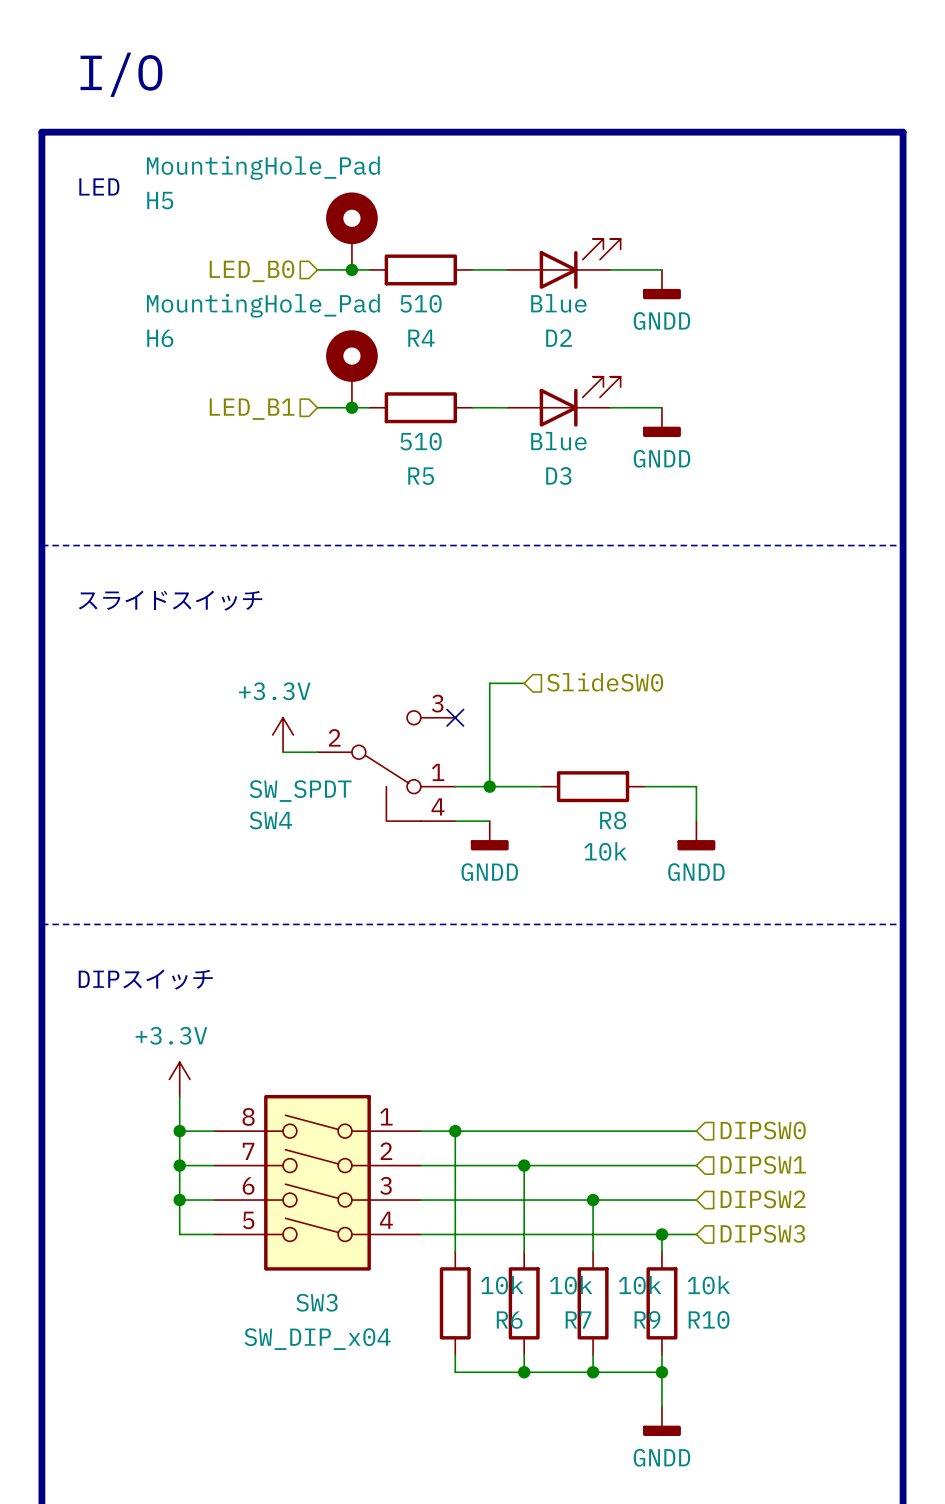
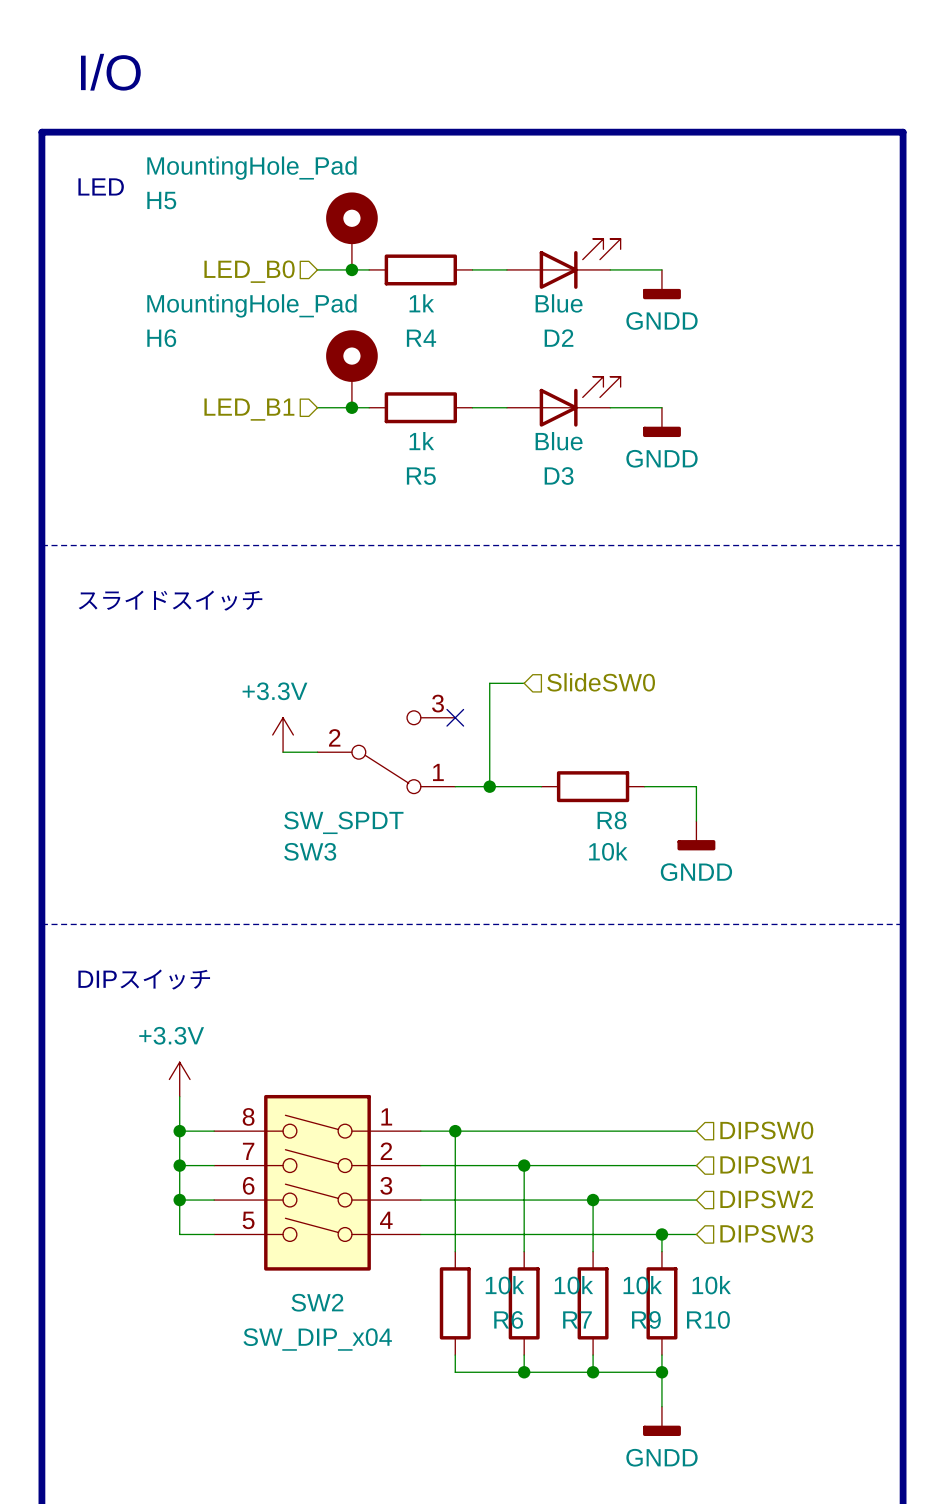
R4 value: 510 (421, 303) -> 1k (421, 303)
R5 value: 510 (421, 441) -> 1k (421, 441)
SW3: none -> SW_SPDT (386, 752)
SW4: SW_SPDT (386, 766) -> none
wire: (455, 821) (489, 821) -> none
power symbol: GNDD (489, 835) -> none
SW3 name: SW3 (317, 1302) -> SW2 (317, 1302)

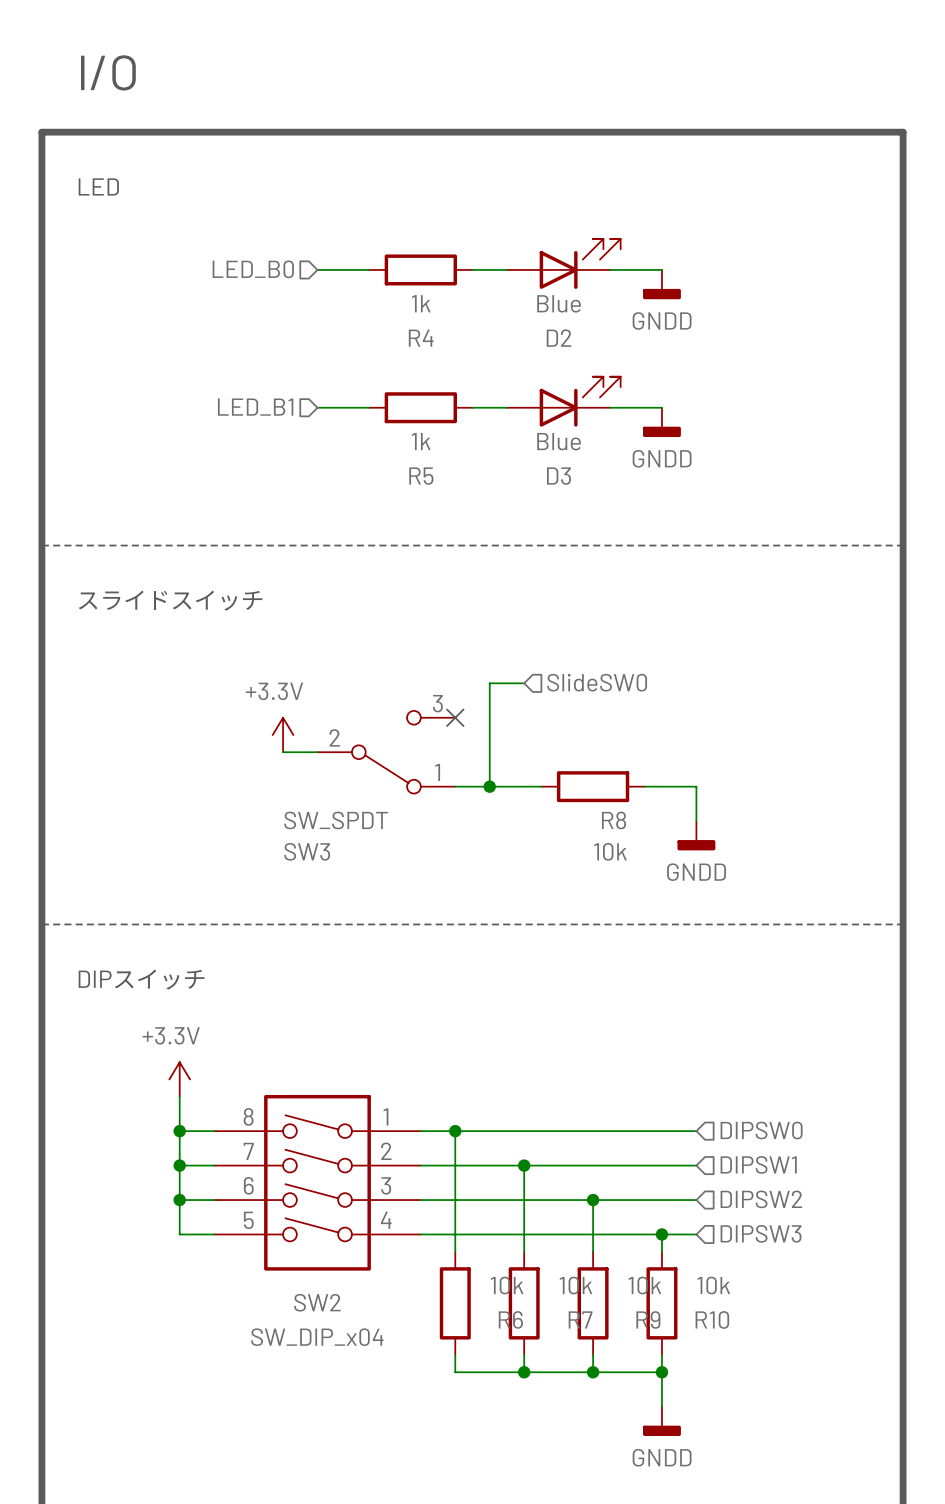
H5: MountingHole_Pad (351, 231) -> none
junction: (351, 269) -> none
H6: MountingHole_Pad (351, 368) -> none
junction: (351, 407) -> none

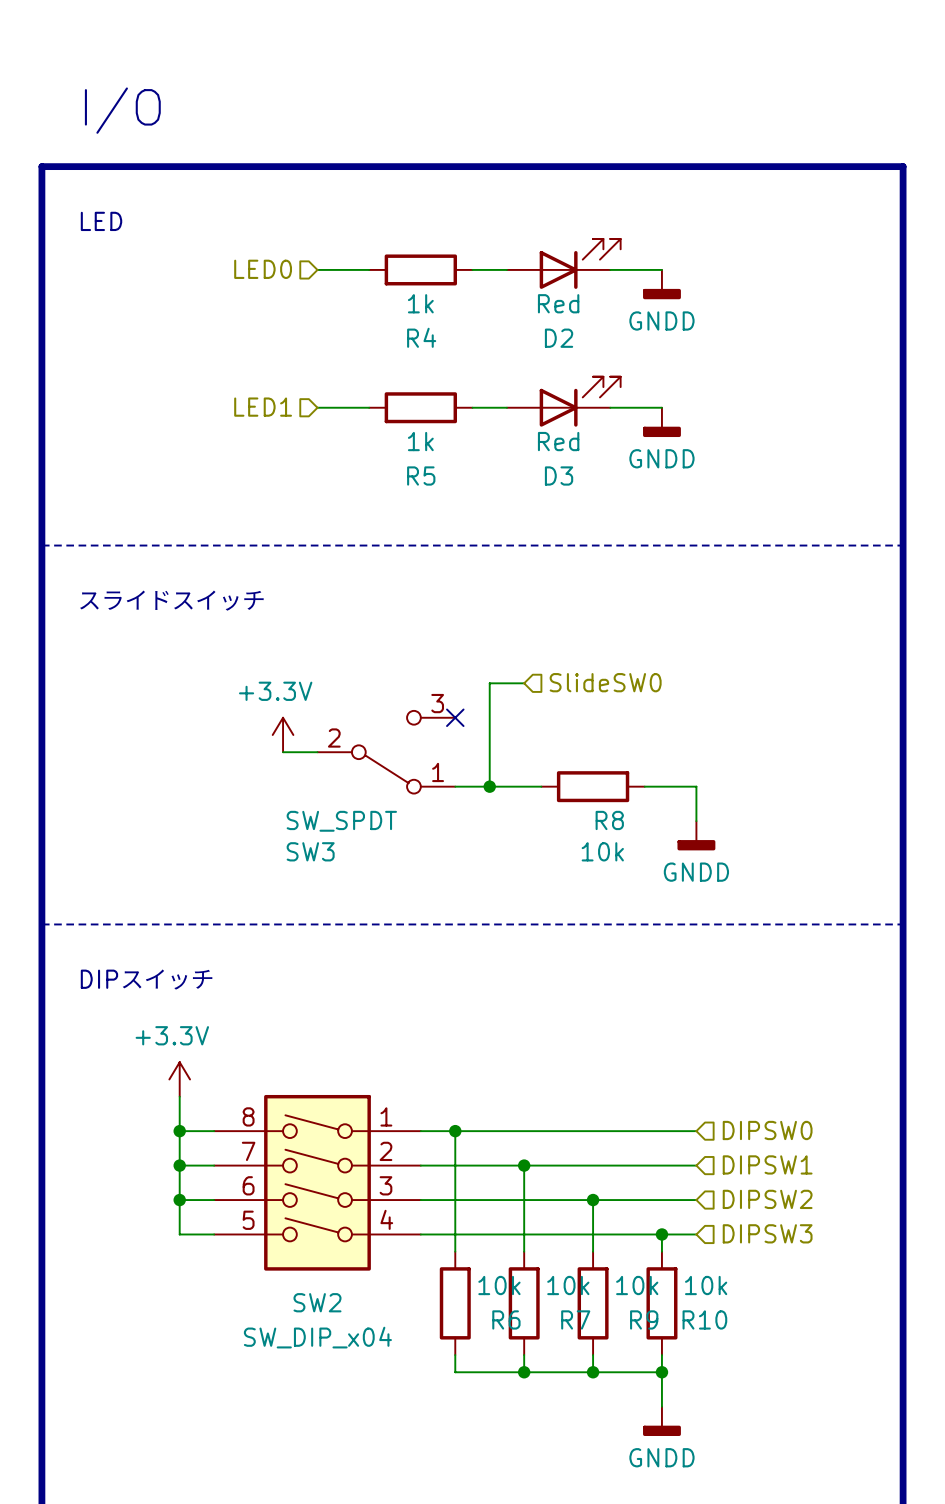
text position: I/O (108, 72) -> I/O (122, 110)
line: (41, 166) (41, 132) (903, 132) (903, 166) -> (41, 166) (903, 166)
text position: LED (98, 186) -> LED (101, 221)
hierarchical label: LED_B0 (253, 269) -> LED0 (263, 269)
D2 value: Blue (559, 303) -> Red (558, 303)
hierarchical label: LED_B1 (255, 407) -> LED1 (263, 407)
D3 value: Blue (559, 441) -> Red (558, 441)

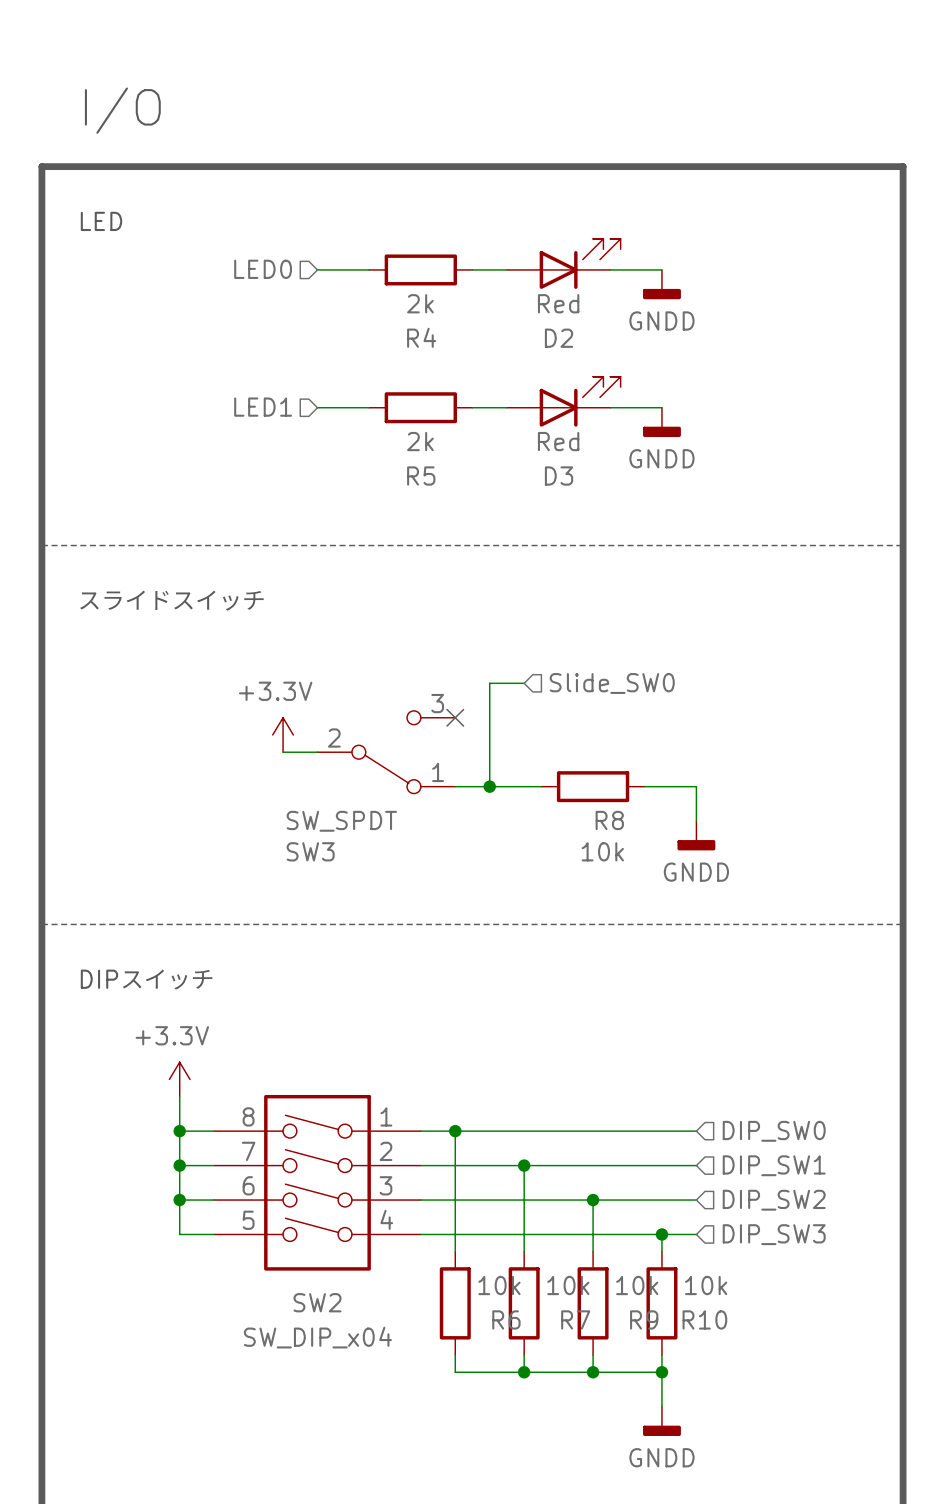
R4 value: 1k (420, 303) -> 2k (420, 303)
R5 value: 1k (420, 441) -> 2k (420, 441)
hierarchical label: SlideSW0 (605, 682) -> Slide_SW0 (612, 683)
hierarchical label: DIPSW0 (767, 1130) -> DIP_SW0 (774, 1131)
hierarchical label: DIPSW1 (767, 1164) -> DIP_SW1 (774, 1165)
hierarchical label: DIPSW2 (767, 1199) -> DIP_SW2 (774, 1200)
hierarchical label: DIPSW3 (767, 1233) -> DIP_SW3 (774, 1234)

